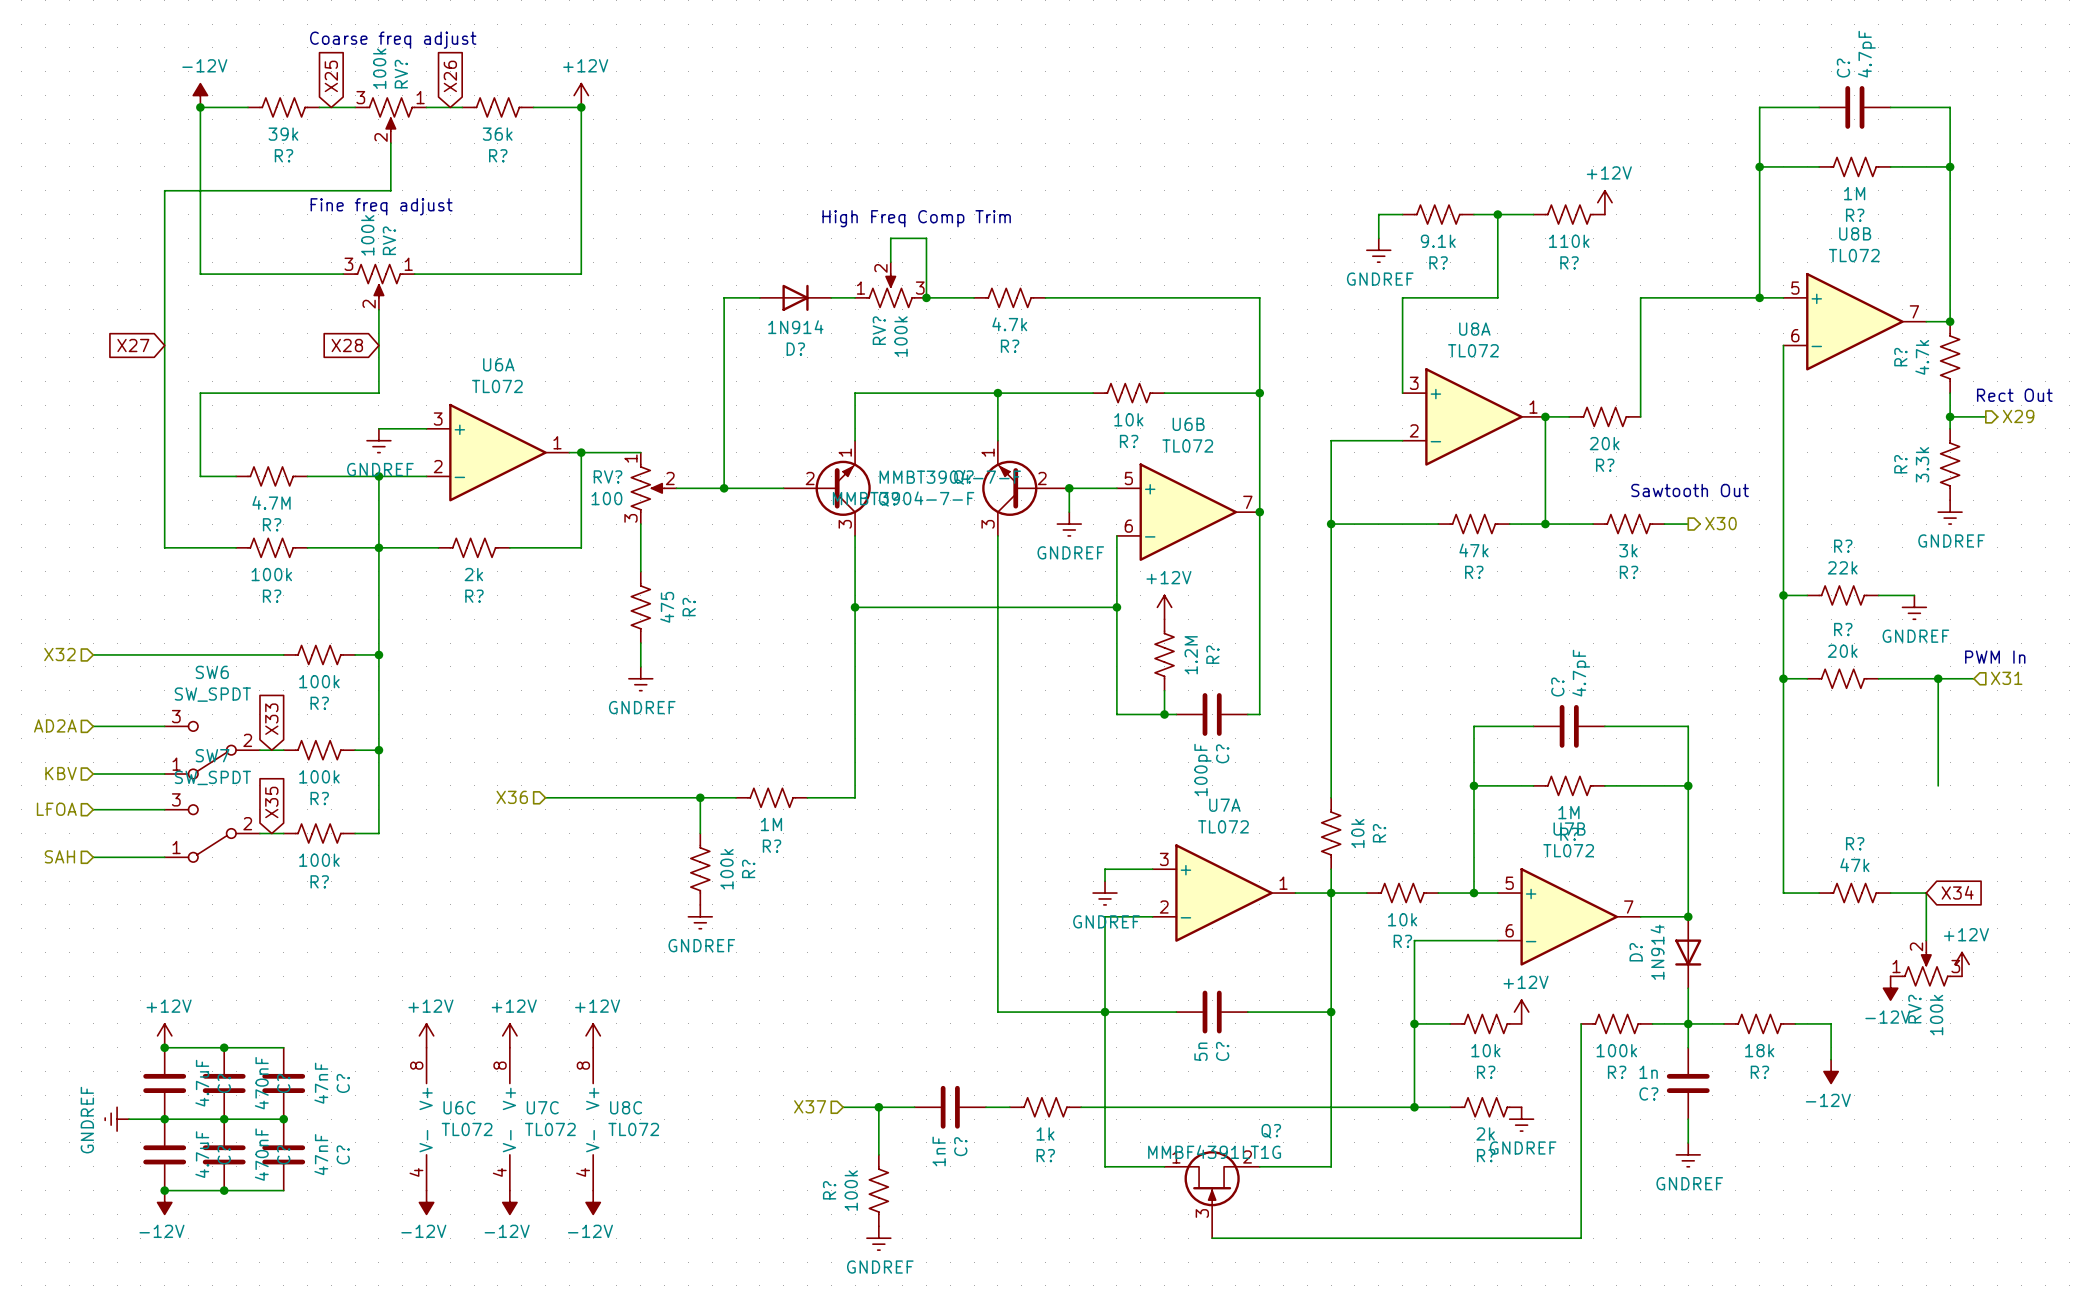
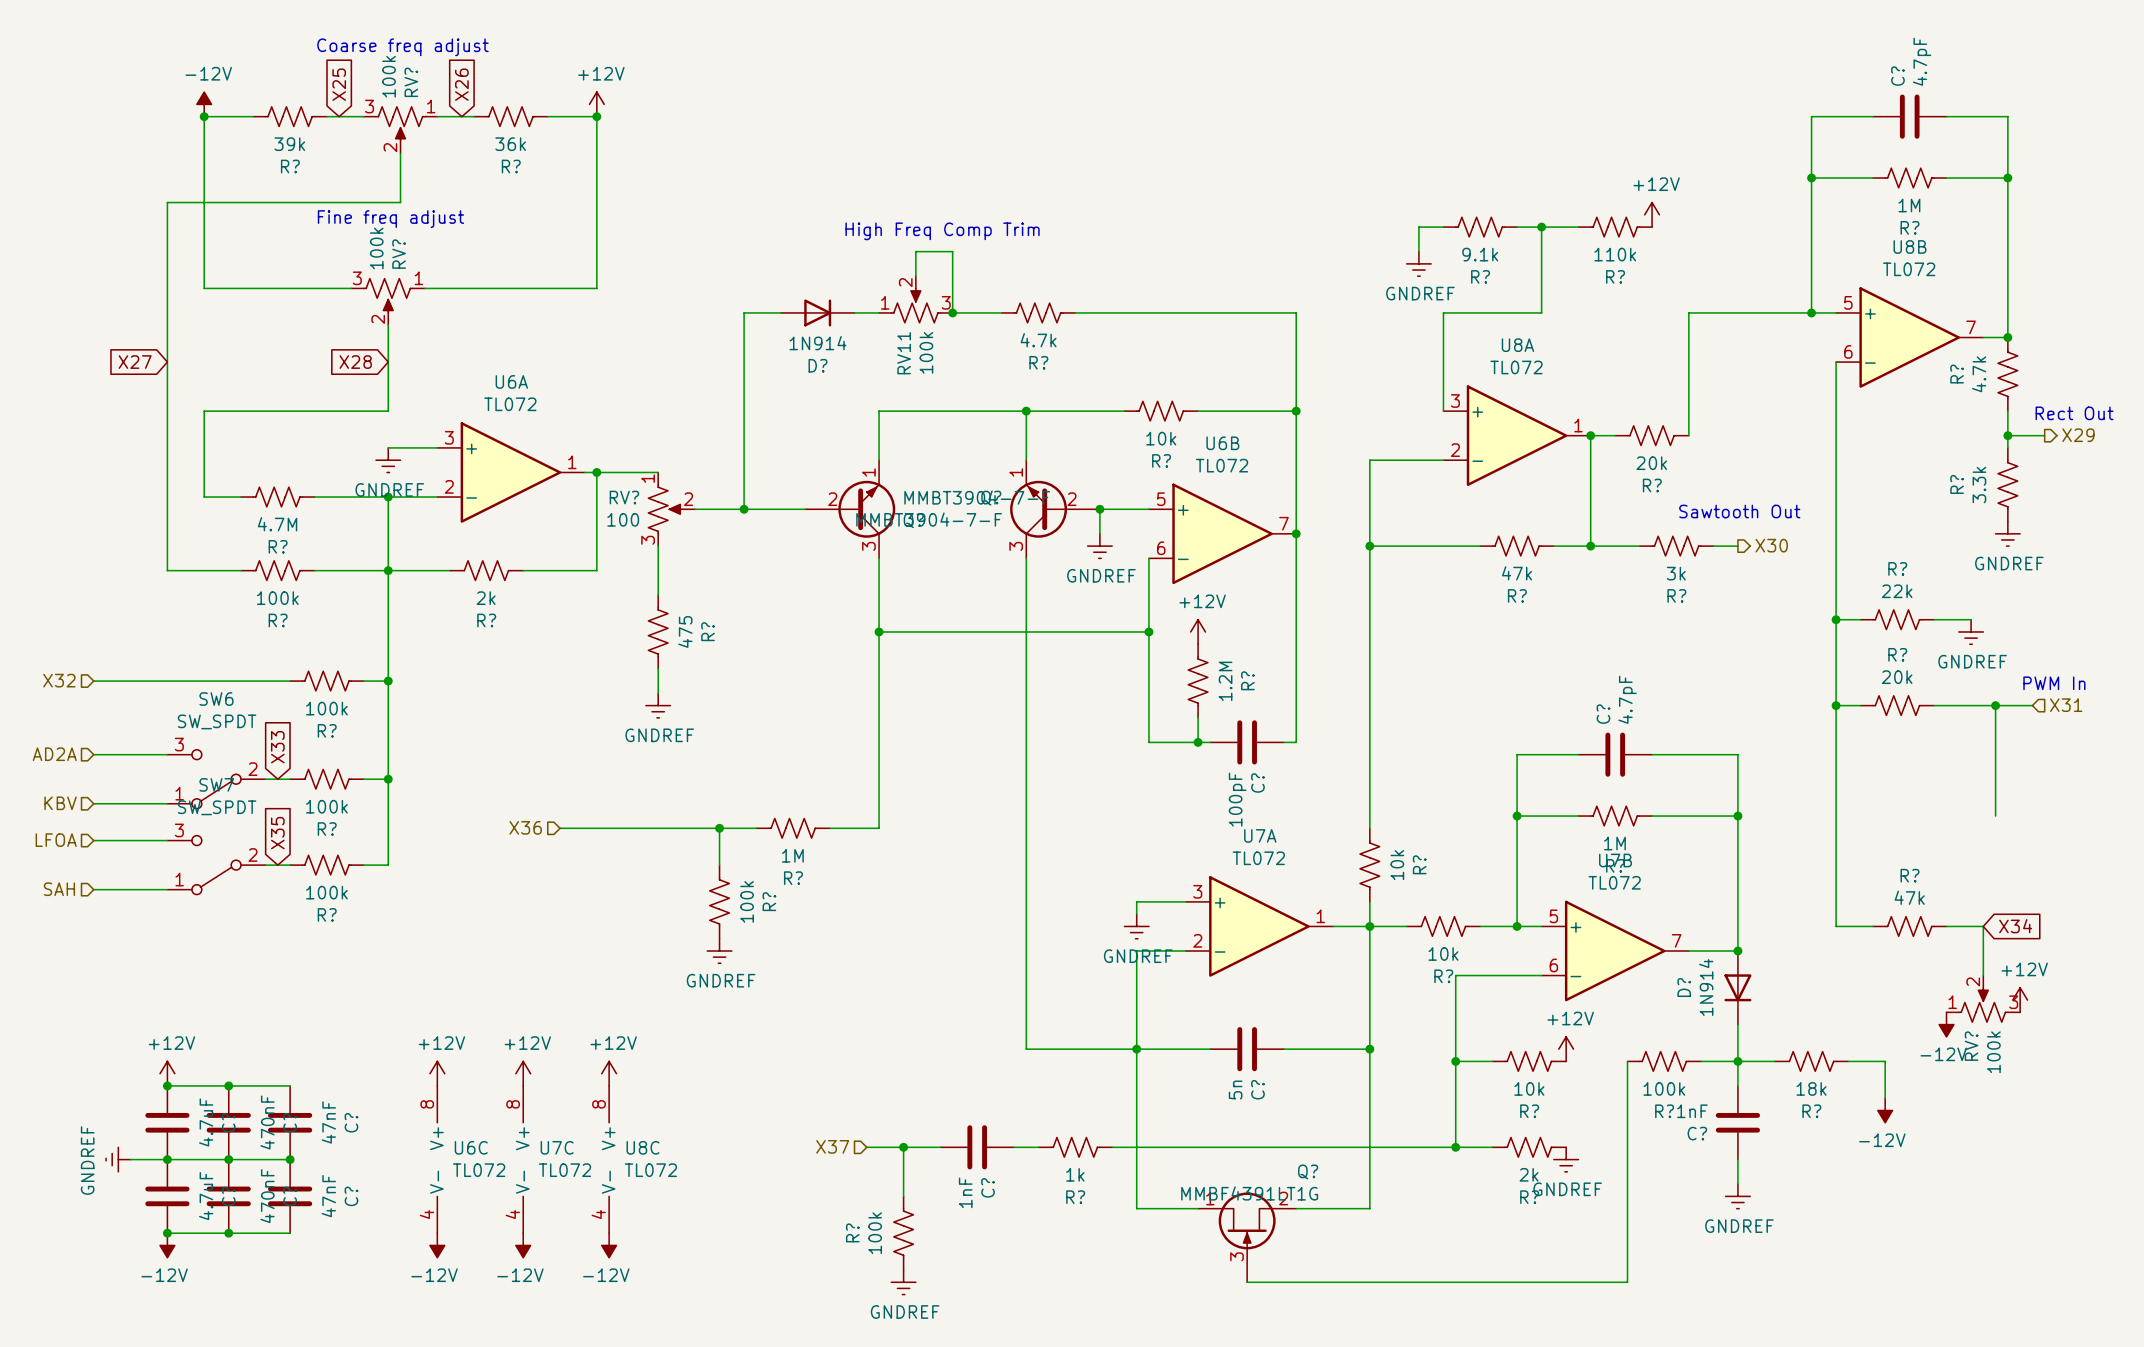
RV? name: RV? (879, 330) -> RV11 (904, 353)
C? value: 1n (1648, 1072) -> 1nF (1692, 1111)

